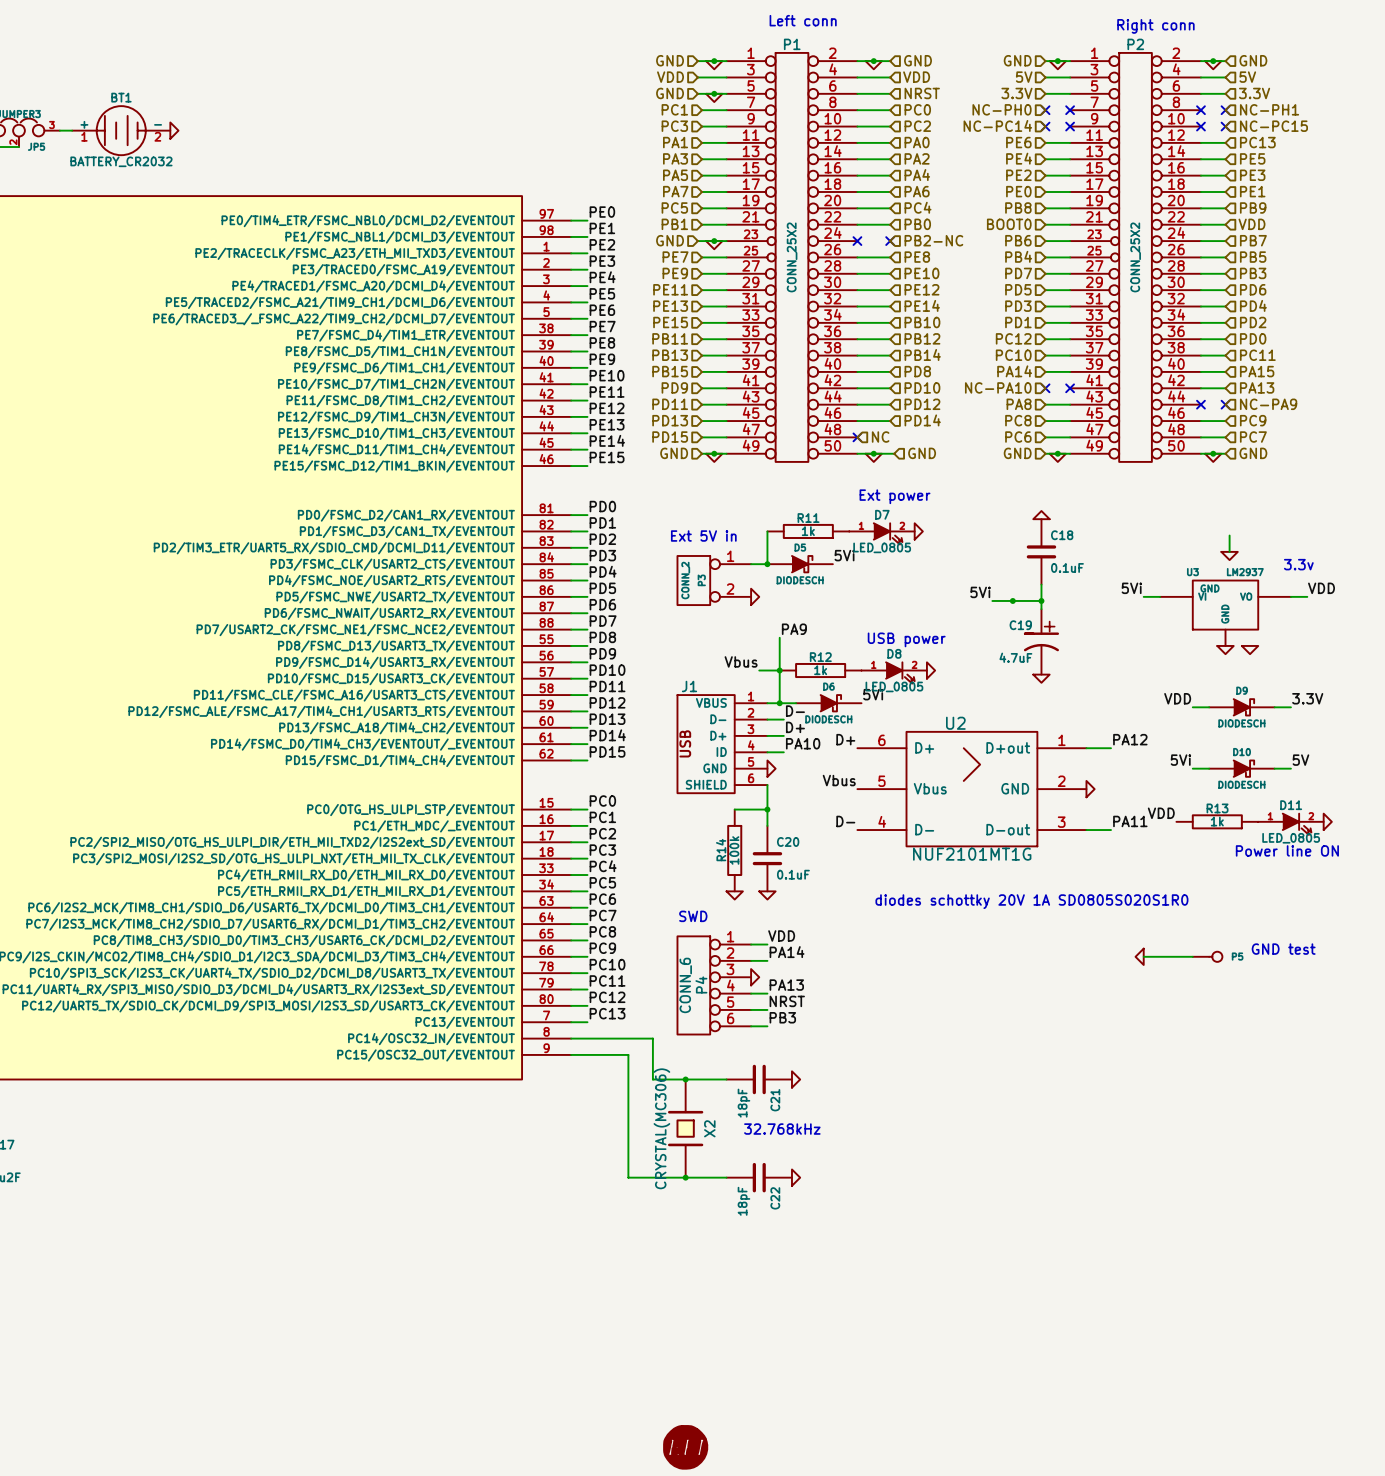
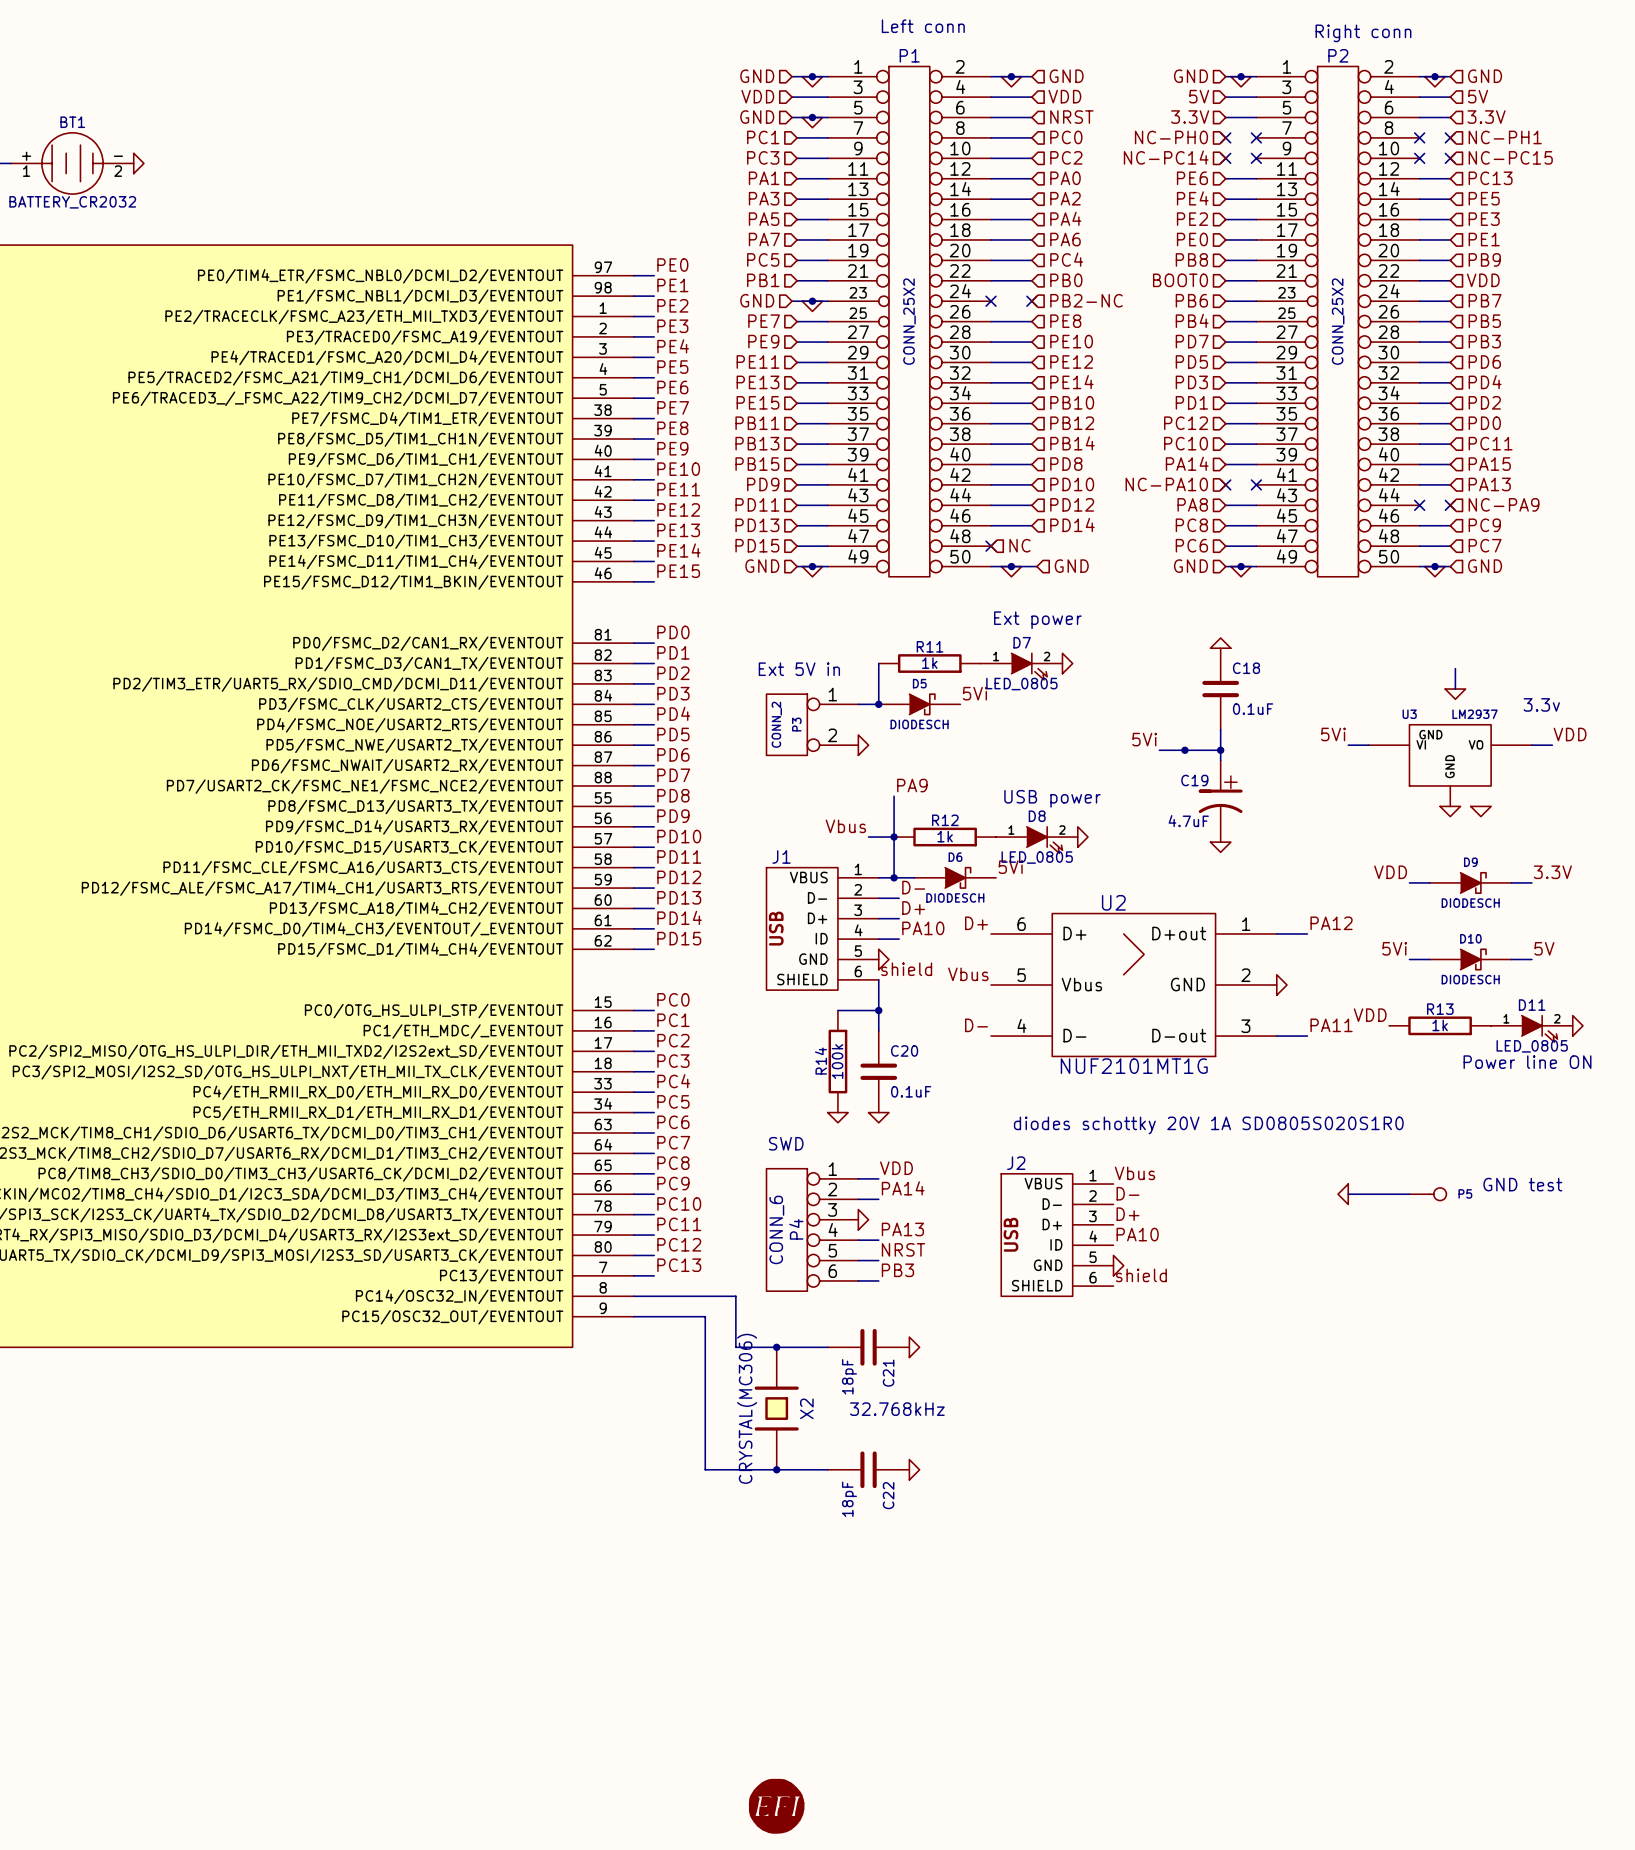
label: none -> shield (906, 969)
label: none -> Vbus (1135, 1173)
label: none -> D- (1128, 1193)
label: none -> D+ (1128, 1214)
J2: none -> (1057, 1235)
label: none -> PA10 (1137, 1234)
power symbol: none -> (1118, 1265)
label: none -> shield (1141, 1275)

